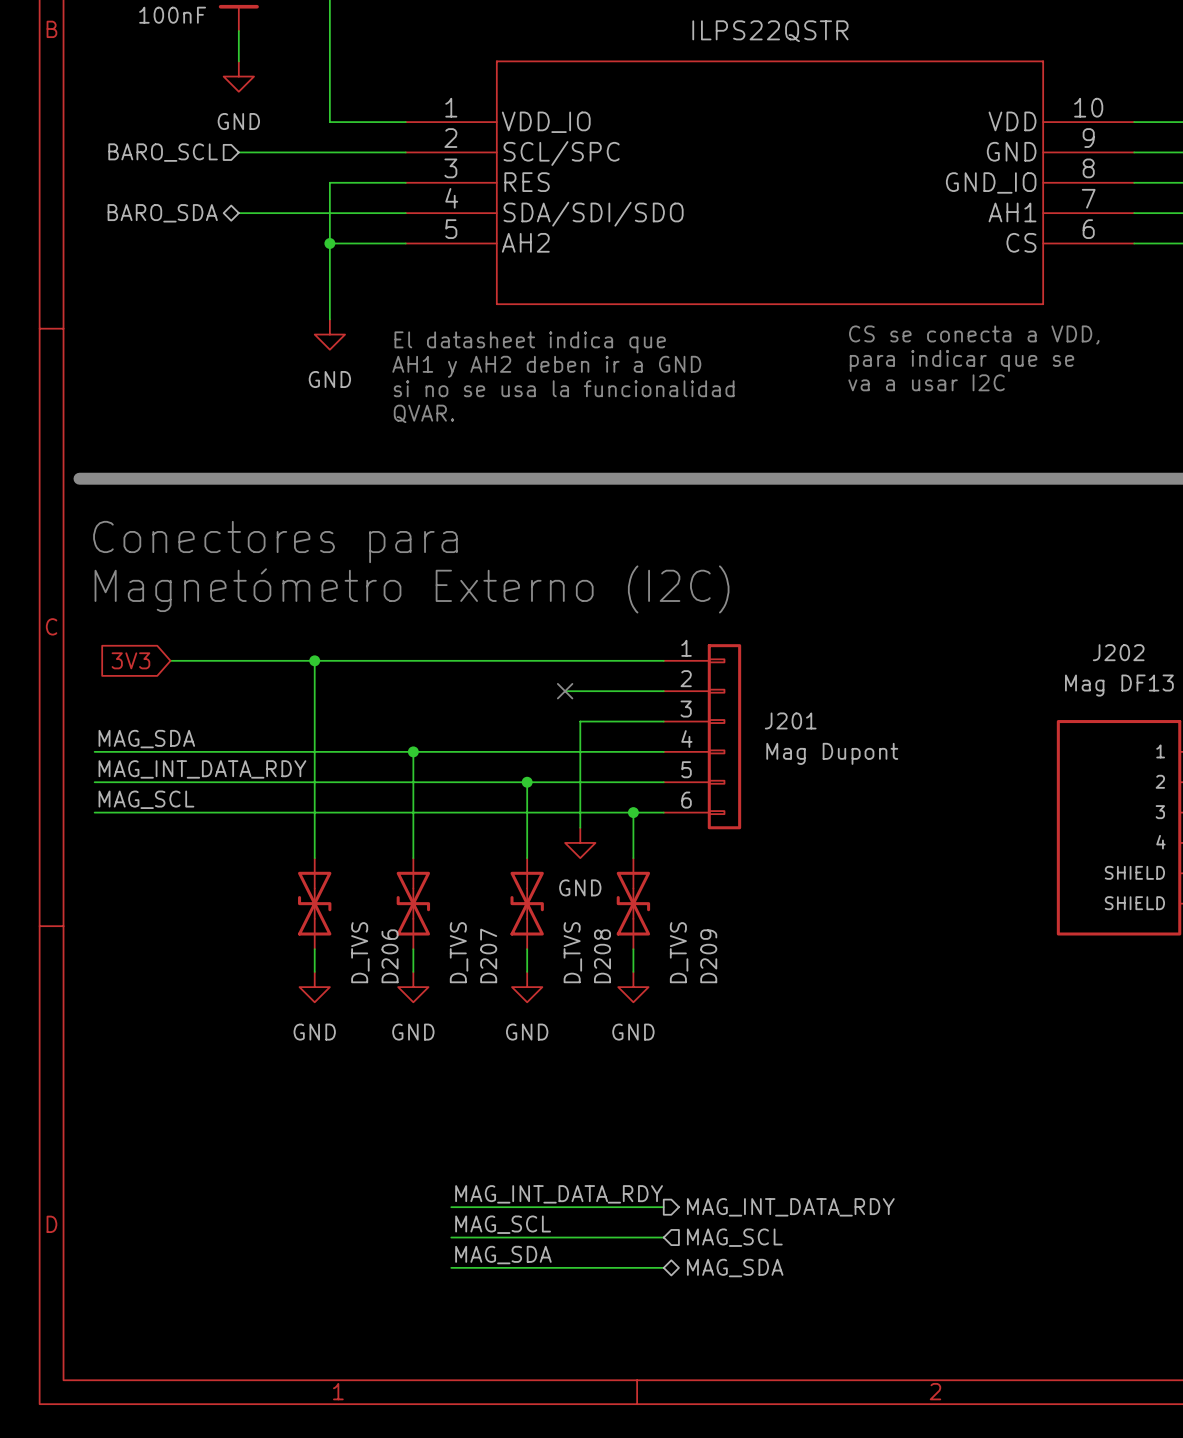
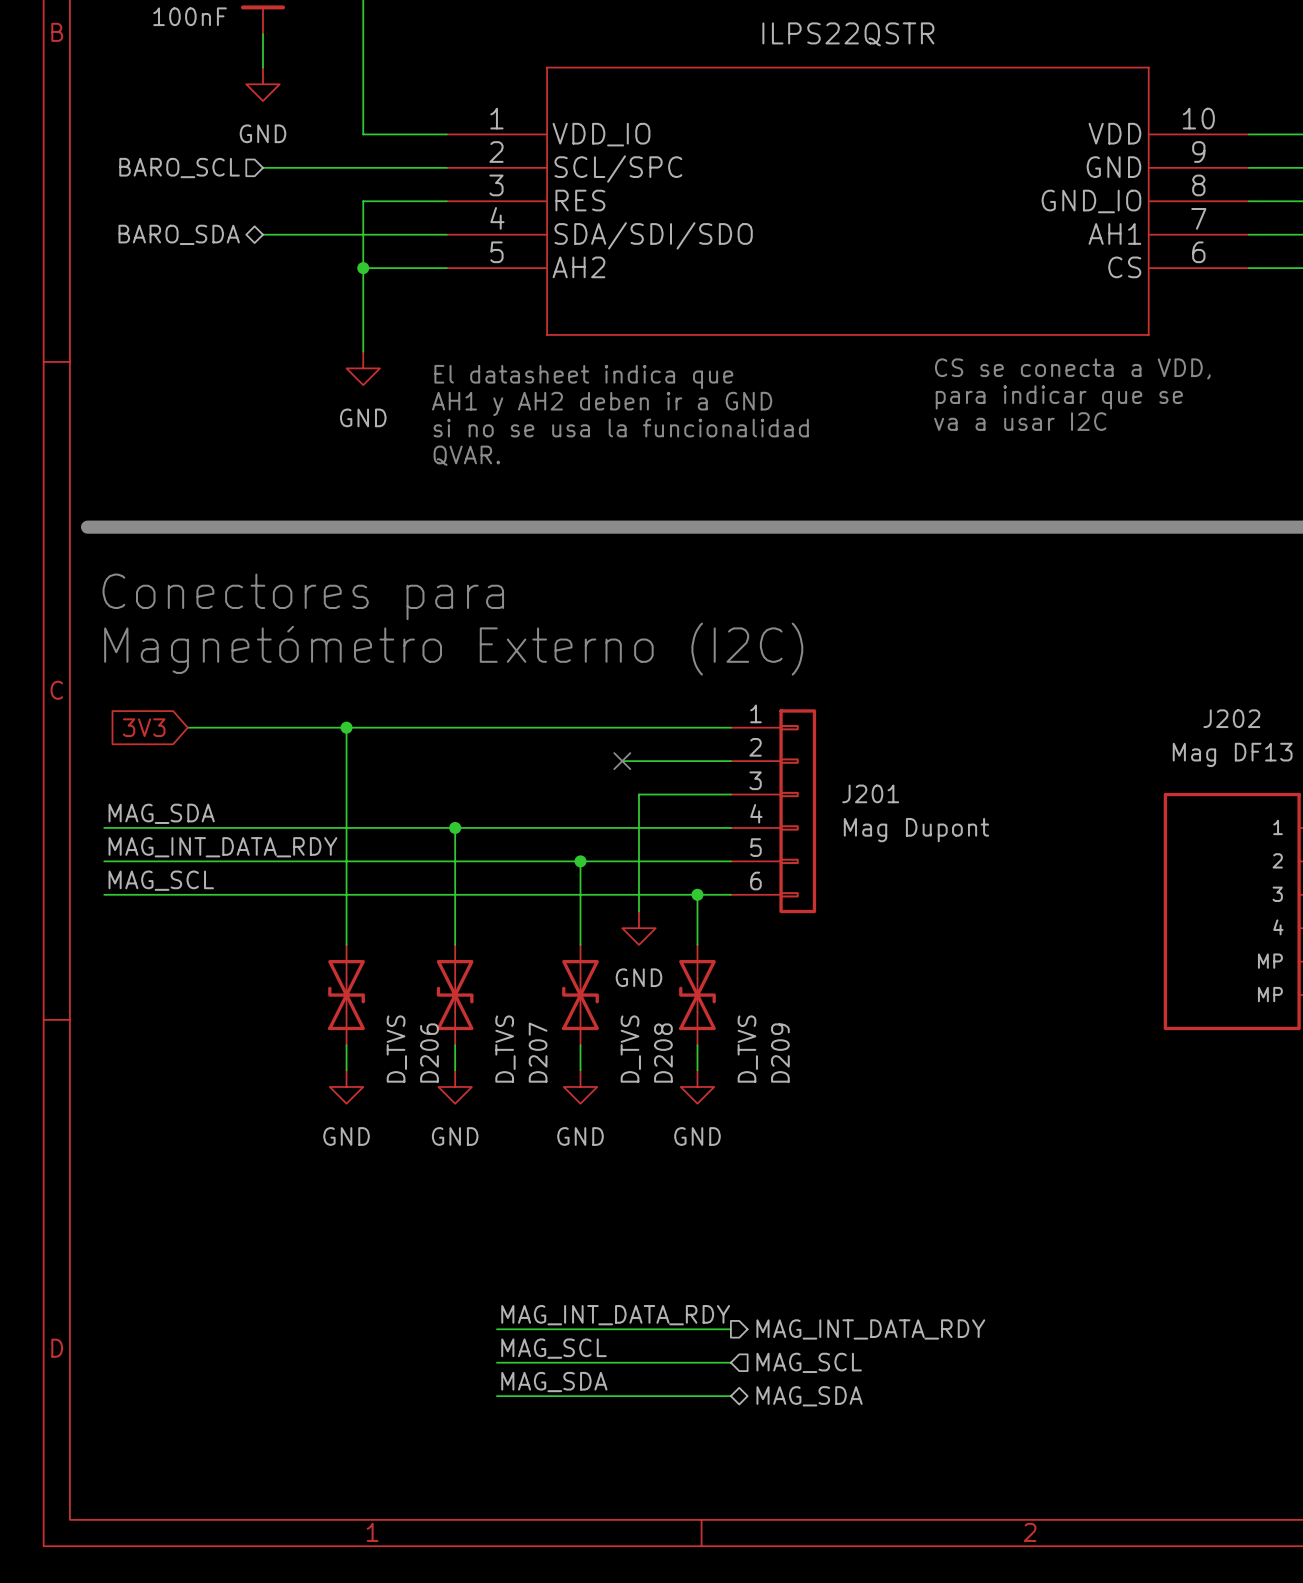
J202 pin name: SHIELD (1134, 872) -> MP (1270, 961)
J202 pin name: SHIELD (1134, 903) -> MP (1270, 994)

